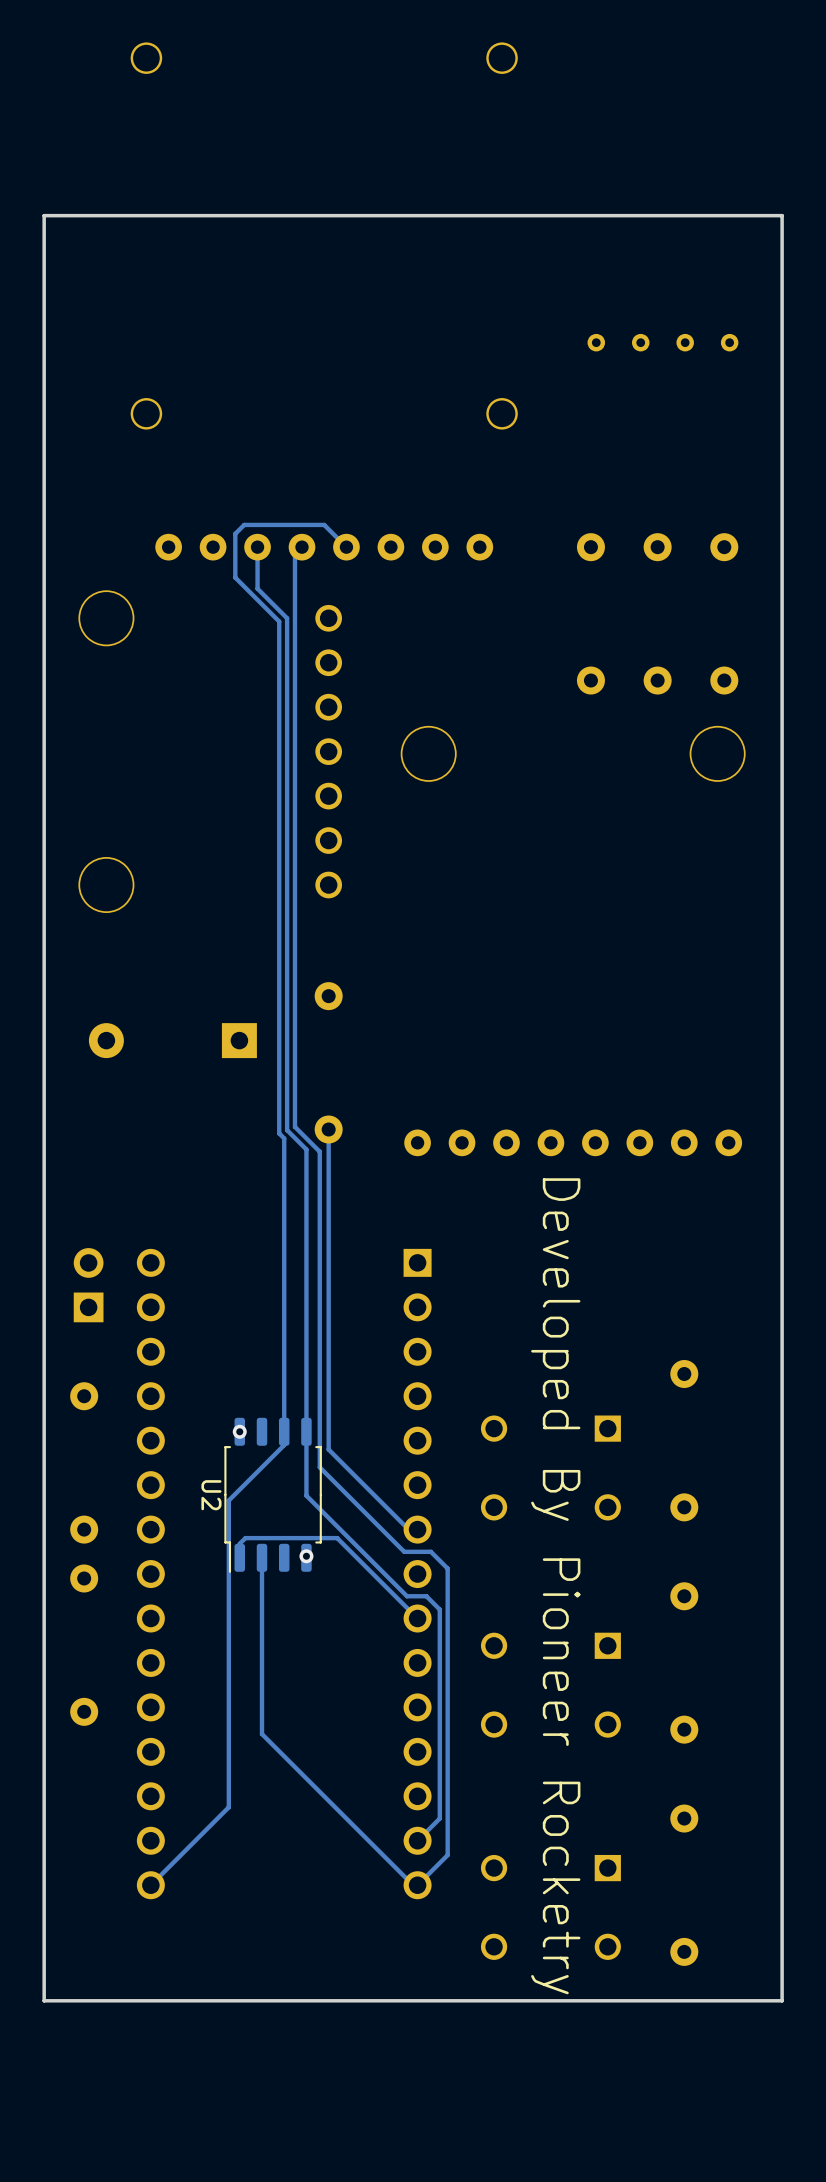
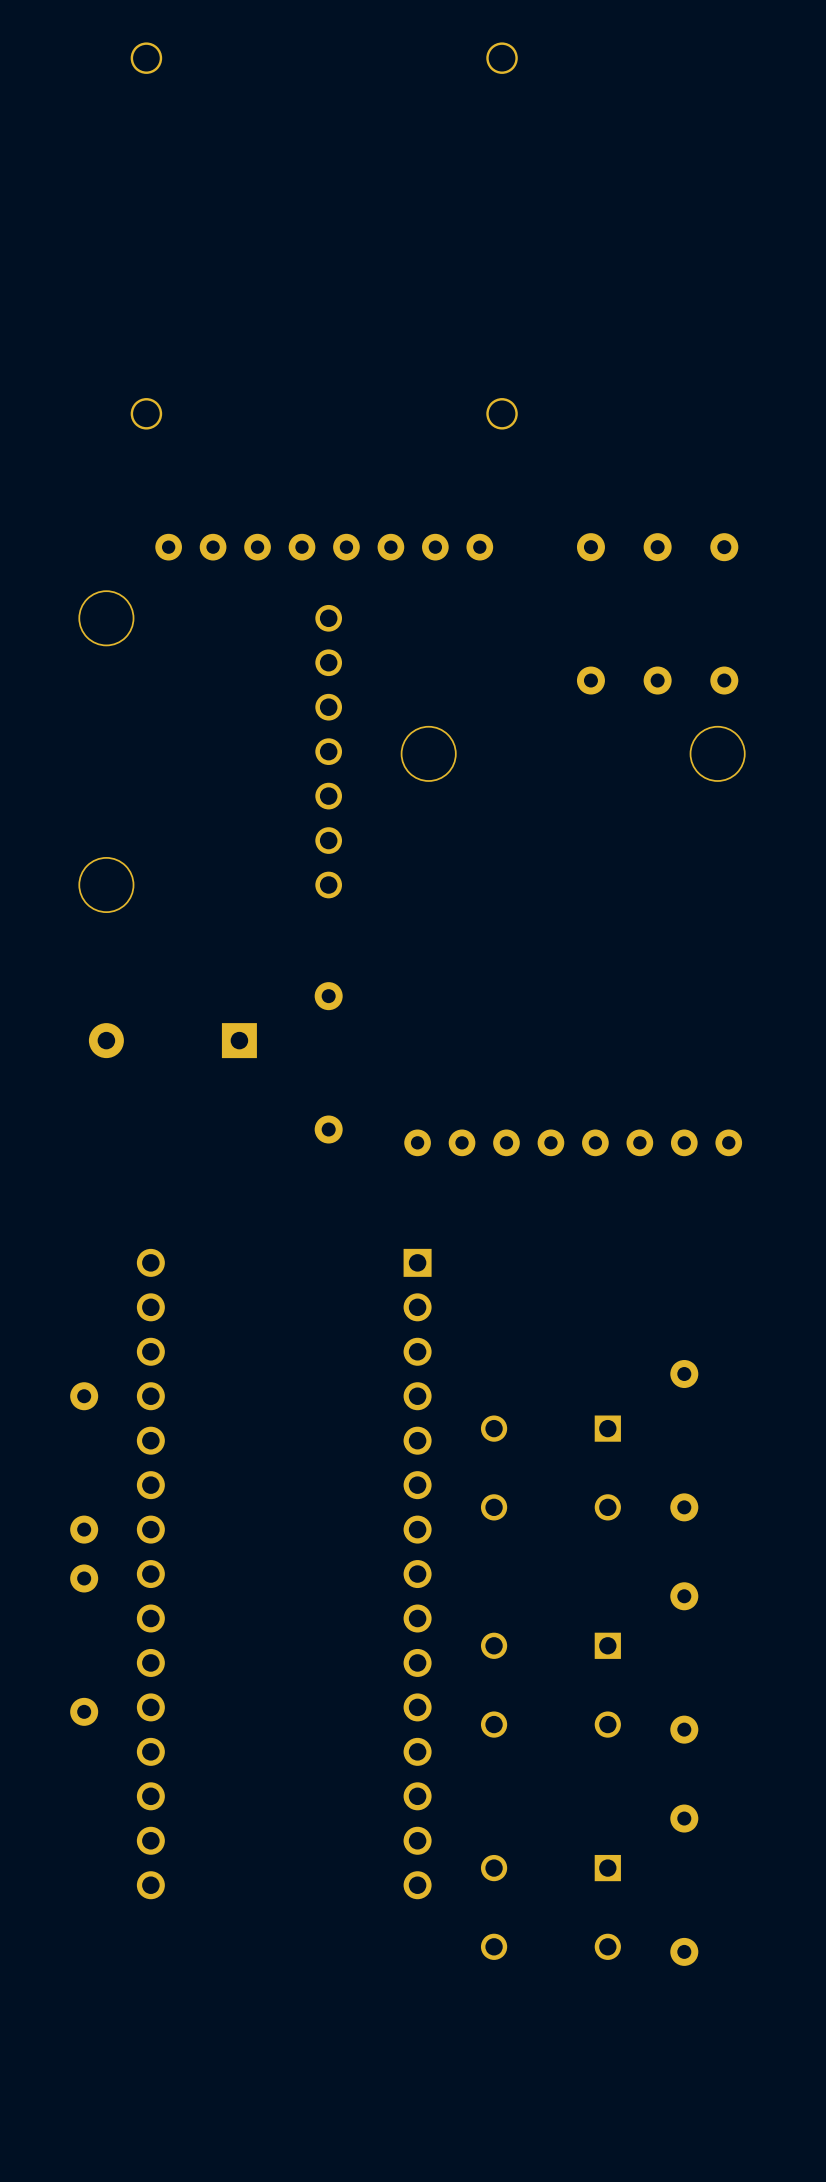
board edge: (782, 215) (44, 215) (44, 2000) (782, 2000) (782, 215) -> none
part: (662, 342) -> none
track: (257, 547) (257, 588) (287, 618) (287, 1130) (306, 1149) (306, 1495) (407, 1596) (426, 1596) (439, 1609) (439, 1818) (417, 1840) -> none
track: (302, 547) (294, 554) (294, 1126) (319, 1151) (319, 1467) (404, 1551) (430, 1551) (447, 1568) (447, 1855) (417, 1885) (413, 1885) (261, 1734) (261, 1557) -> none
track: (346, 547) (324, 524) (244, 524) (235, 533) (235, 577) (279, 621) (279, 1133) (284, 1138) (284, 1445) (228, 1500) (228, 1807) (150, 1885) -> none
track: (328, 1129) (328, 1449) (408, 1529) (417, 1529) -> none
part: (88, 1285) -> none
via: (239, 1431) -> none
U2: (273, 1495) -> none
via: (306, 1556) -> none
track: (239, 1557) (239, 1543) (245, 1538) (337, 1538) (417, 1618) -> none
text: Developed By Pioneer Rocketry (555, 1586) -> none

